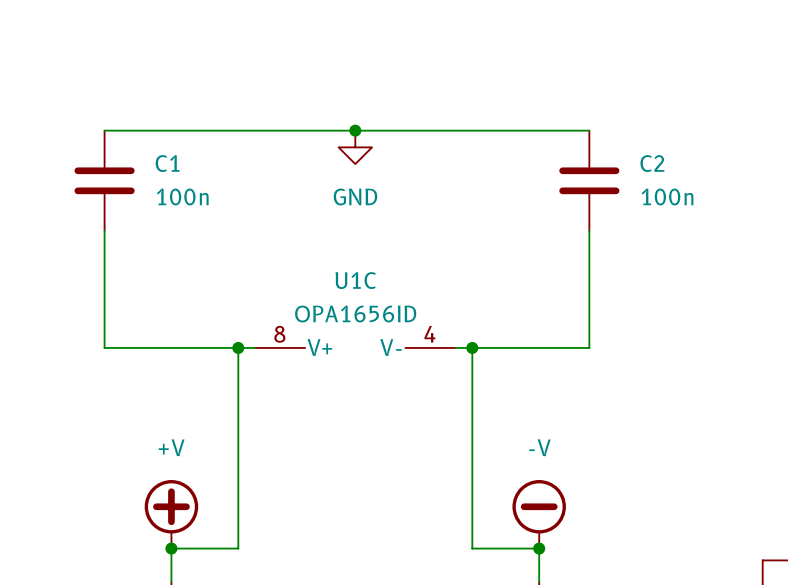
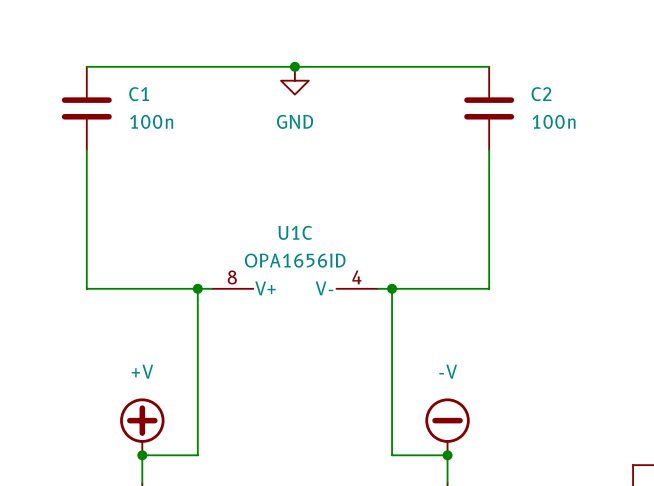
wire: (104, 130) (589, 130) -> (86, 66) (489, 66)
junction position: (355, 130) -> (294, 66)
power symbol position: GND (355, 147) -> GND (294, 80)
C1 position: (104, 180) -> (86, 108)
C2 position: (589, 180) -> (489, 108)

